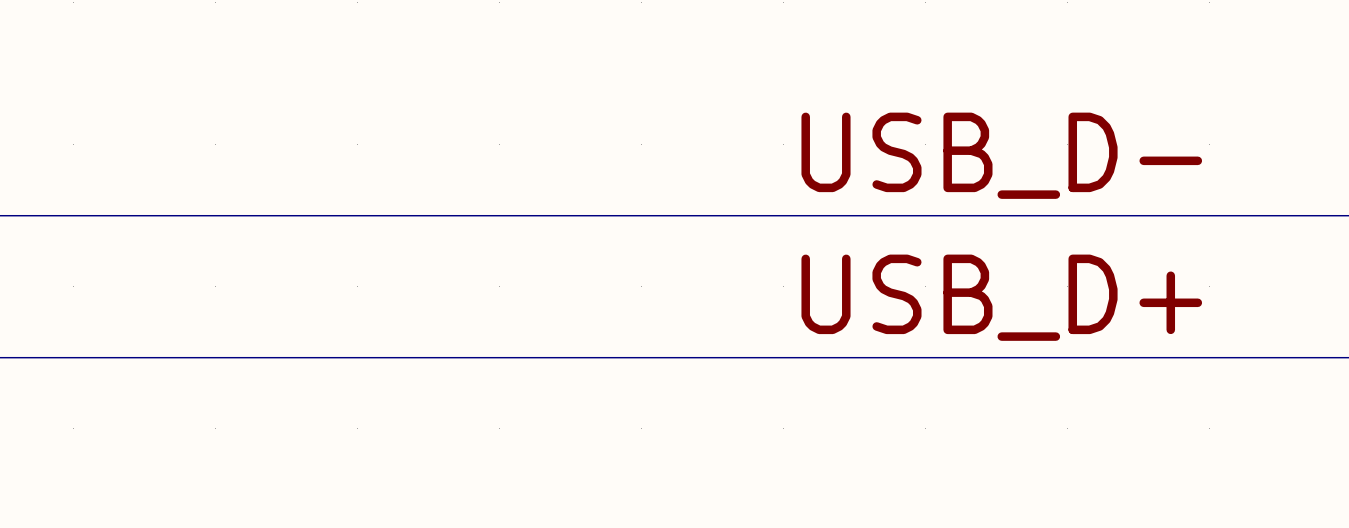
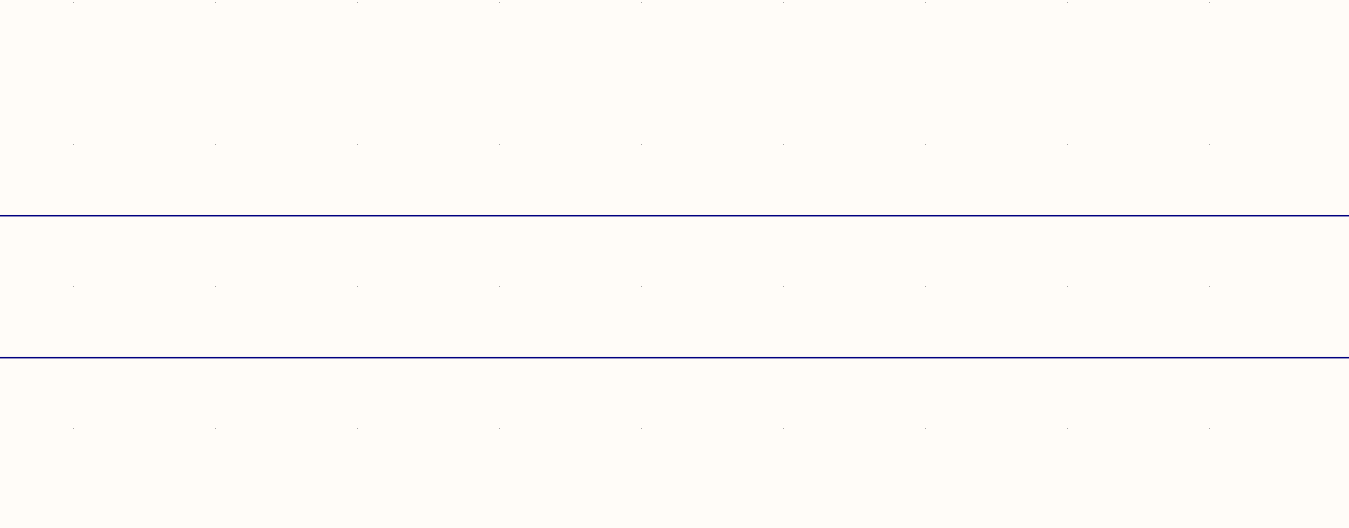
label: USB_D- (1001, 155) -> none
label: USB_D+ (1001, 297) -> none

